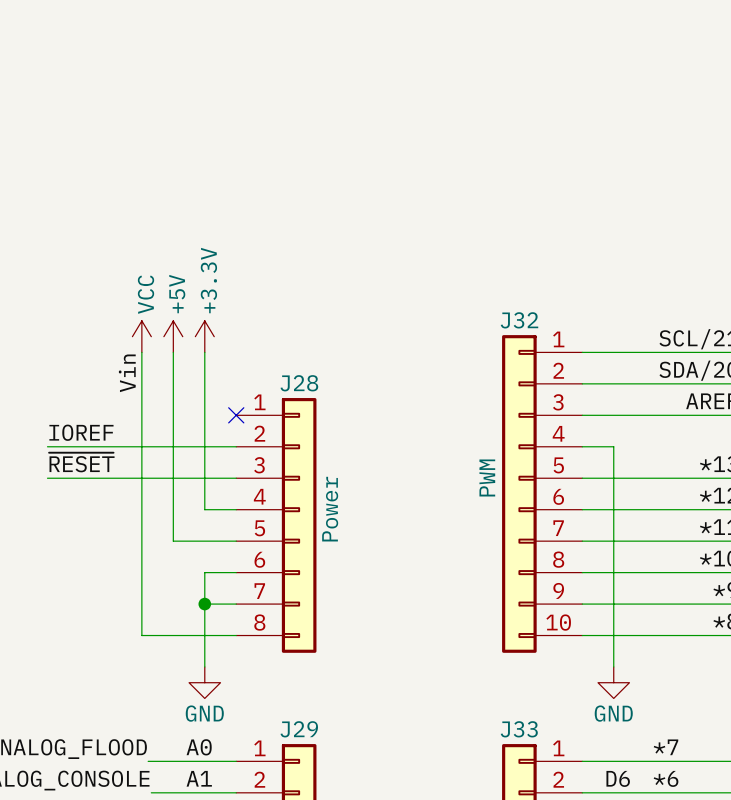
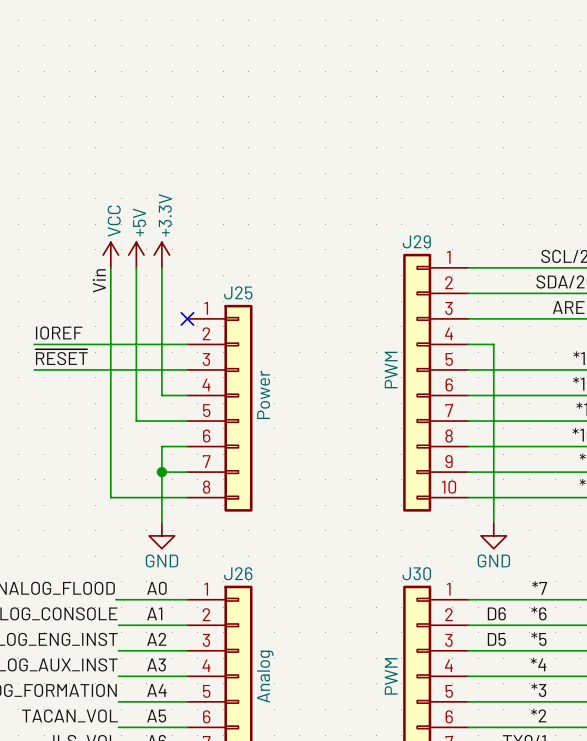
J32 name: J32 (519, 320) -> J29 (416, 241)
J28 name: J28 (299, 383) -> J25 (238, 292)
J29 name: J29 (299, 729) -> J26 (238, 573)
J33 name: J33 (519, 729) -> J30 (416, 573)

